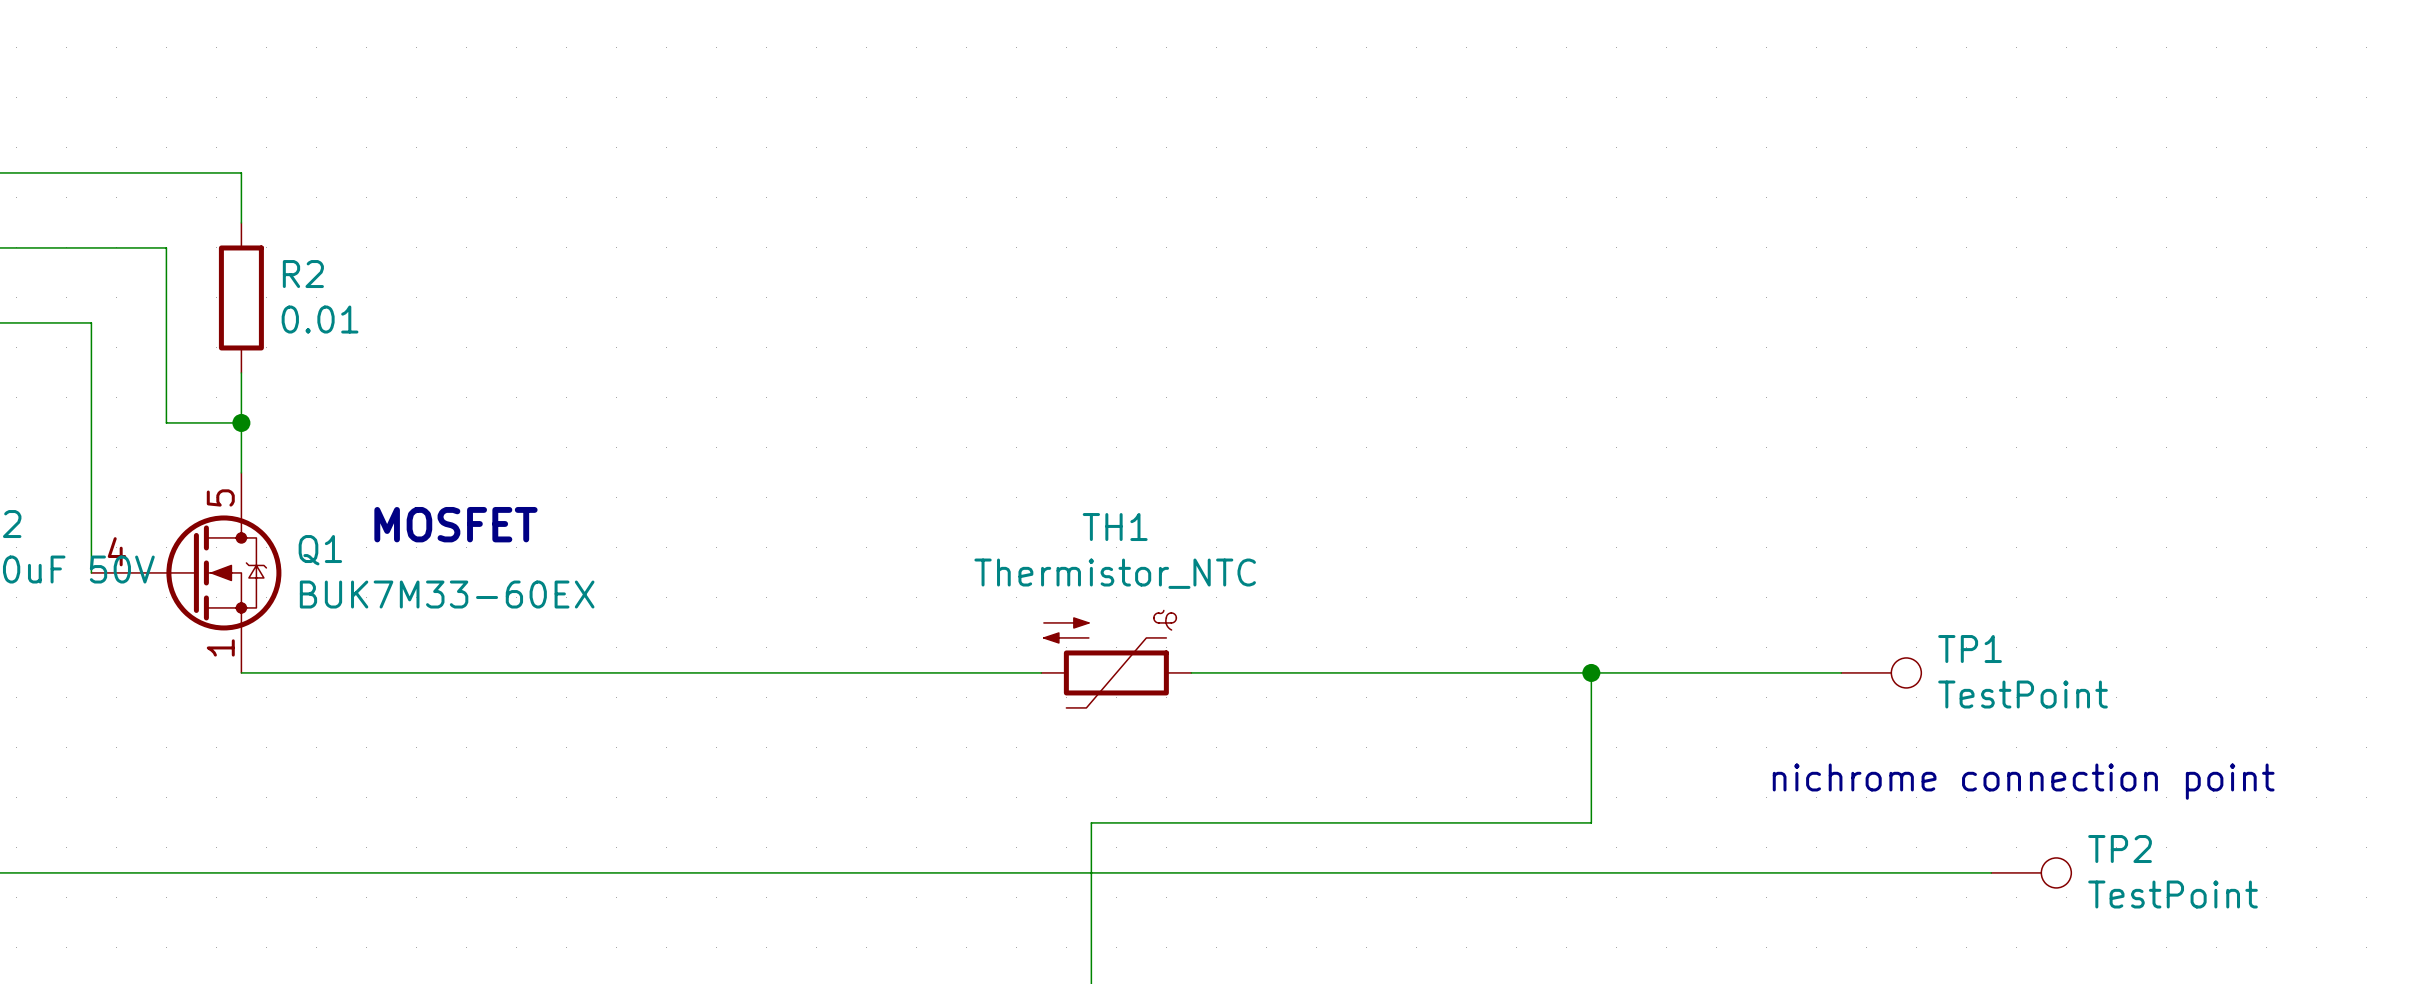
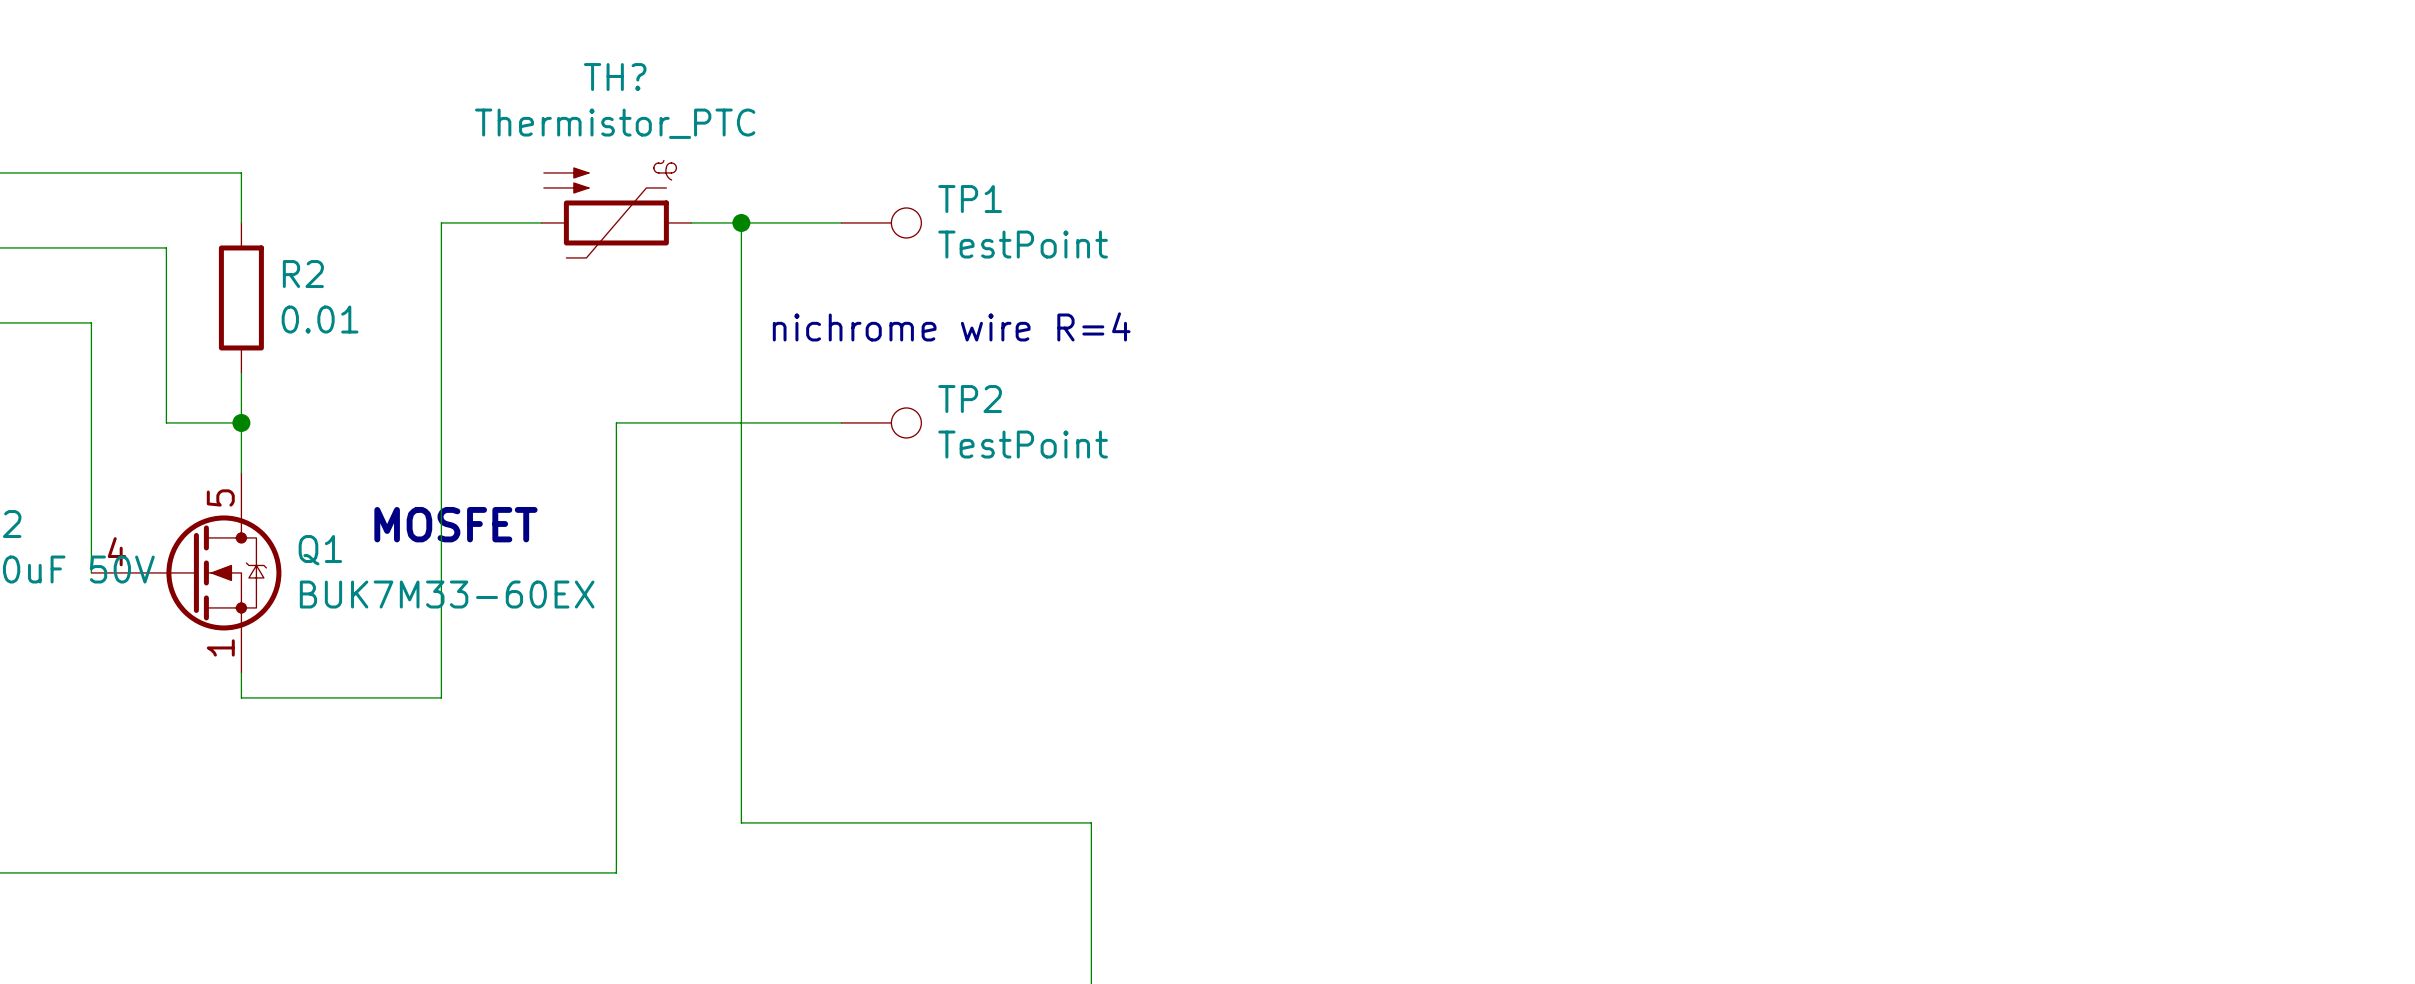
TH?: none -> Thermistor_PTC (616, 209)
wire: none -> (691, 222) (841, 222)
junction: none -> (741, 222)
text: none -> nichrome wire R=4 (951, 326)
TH1: Thermistor_NTC (1116, 659) -> none
wire: (241, 672) (1041, 672) -> (241, 672) (241, 697) (441, 697) (441, 222) (541, 222)
wire: (1191, 672) (1841, 672) -> none
wire: (1591, 672) (1591, 822) (1091, 822) -> (741, 222) (741, 822) (1091, 822)
junction: (1591, 672) -> none
TP1 position: (1881, 672) -> (881, 222)
text: nichrome connection point (2023, 781) -> none
wire: (616, 872) (1991, 872) -> (616, 872) (616, 422) (841, 422)
TP2 position: (2031, 872) -> (881, 422)

